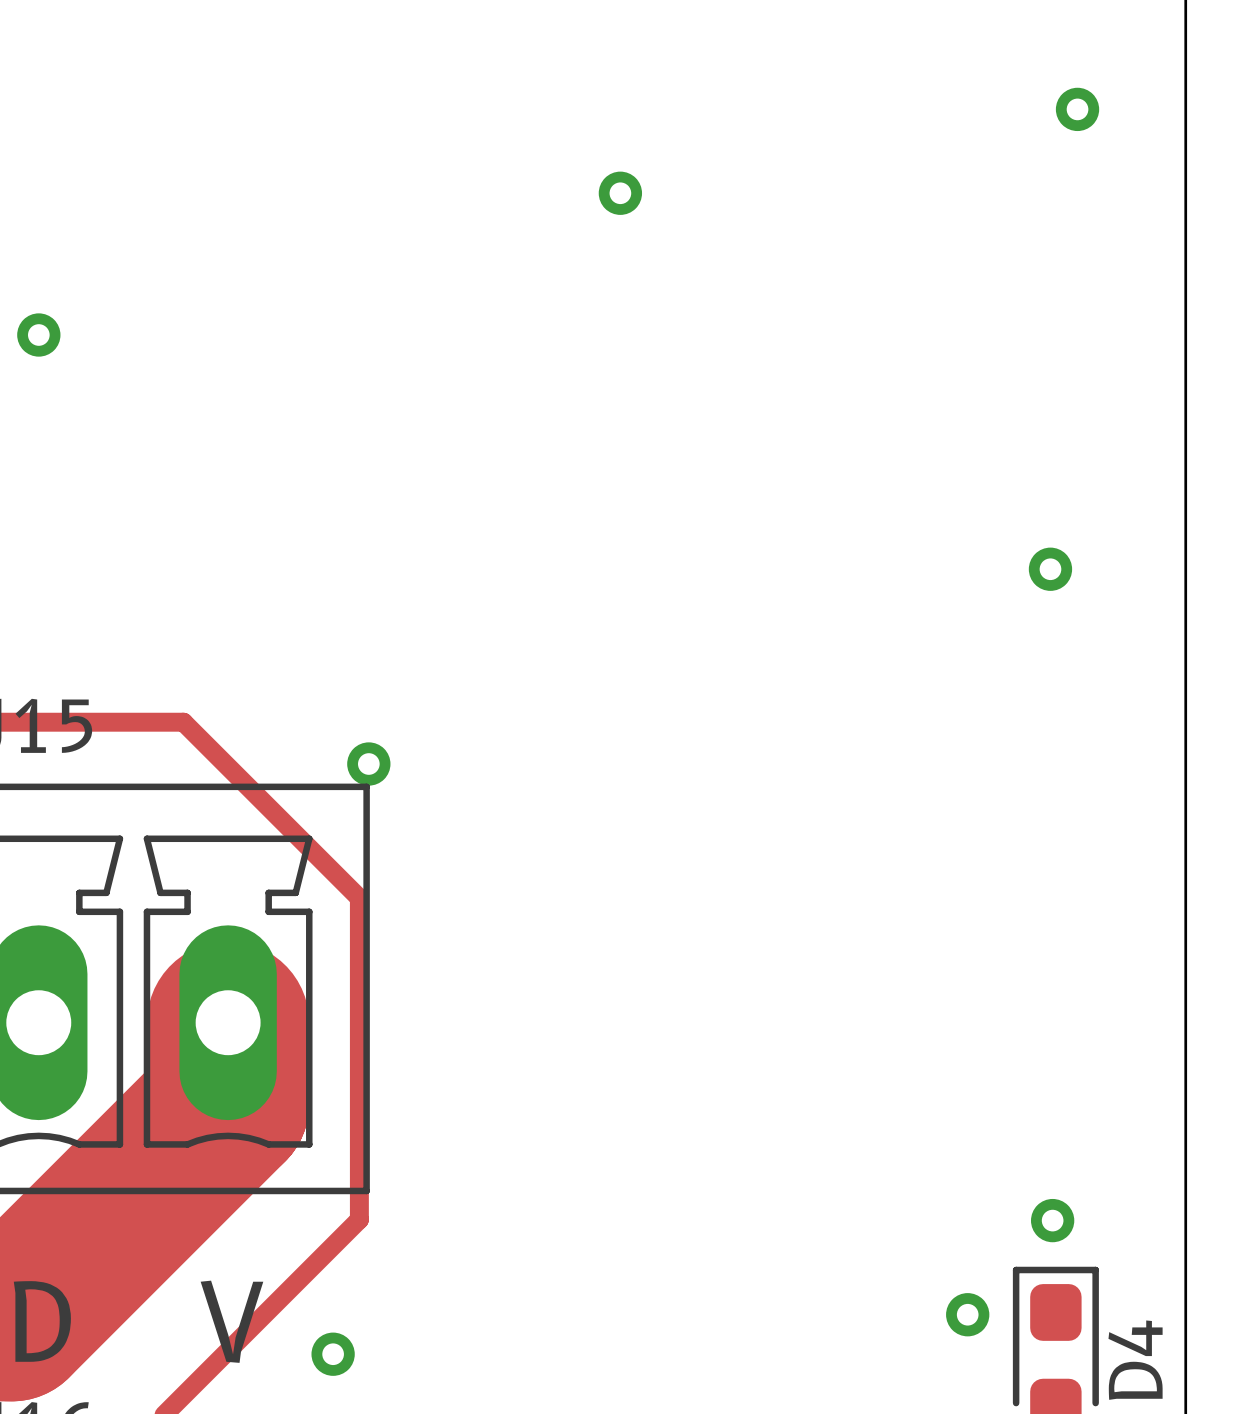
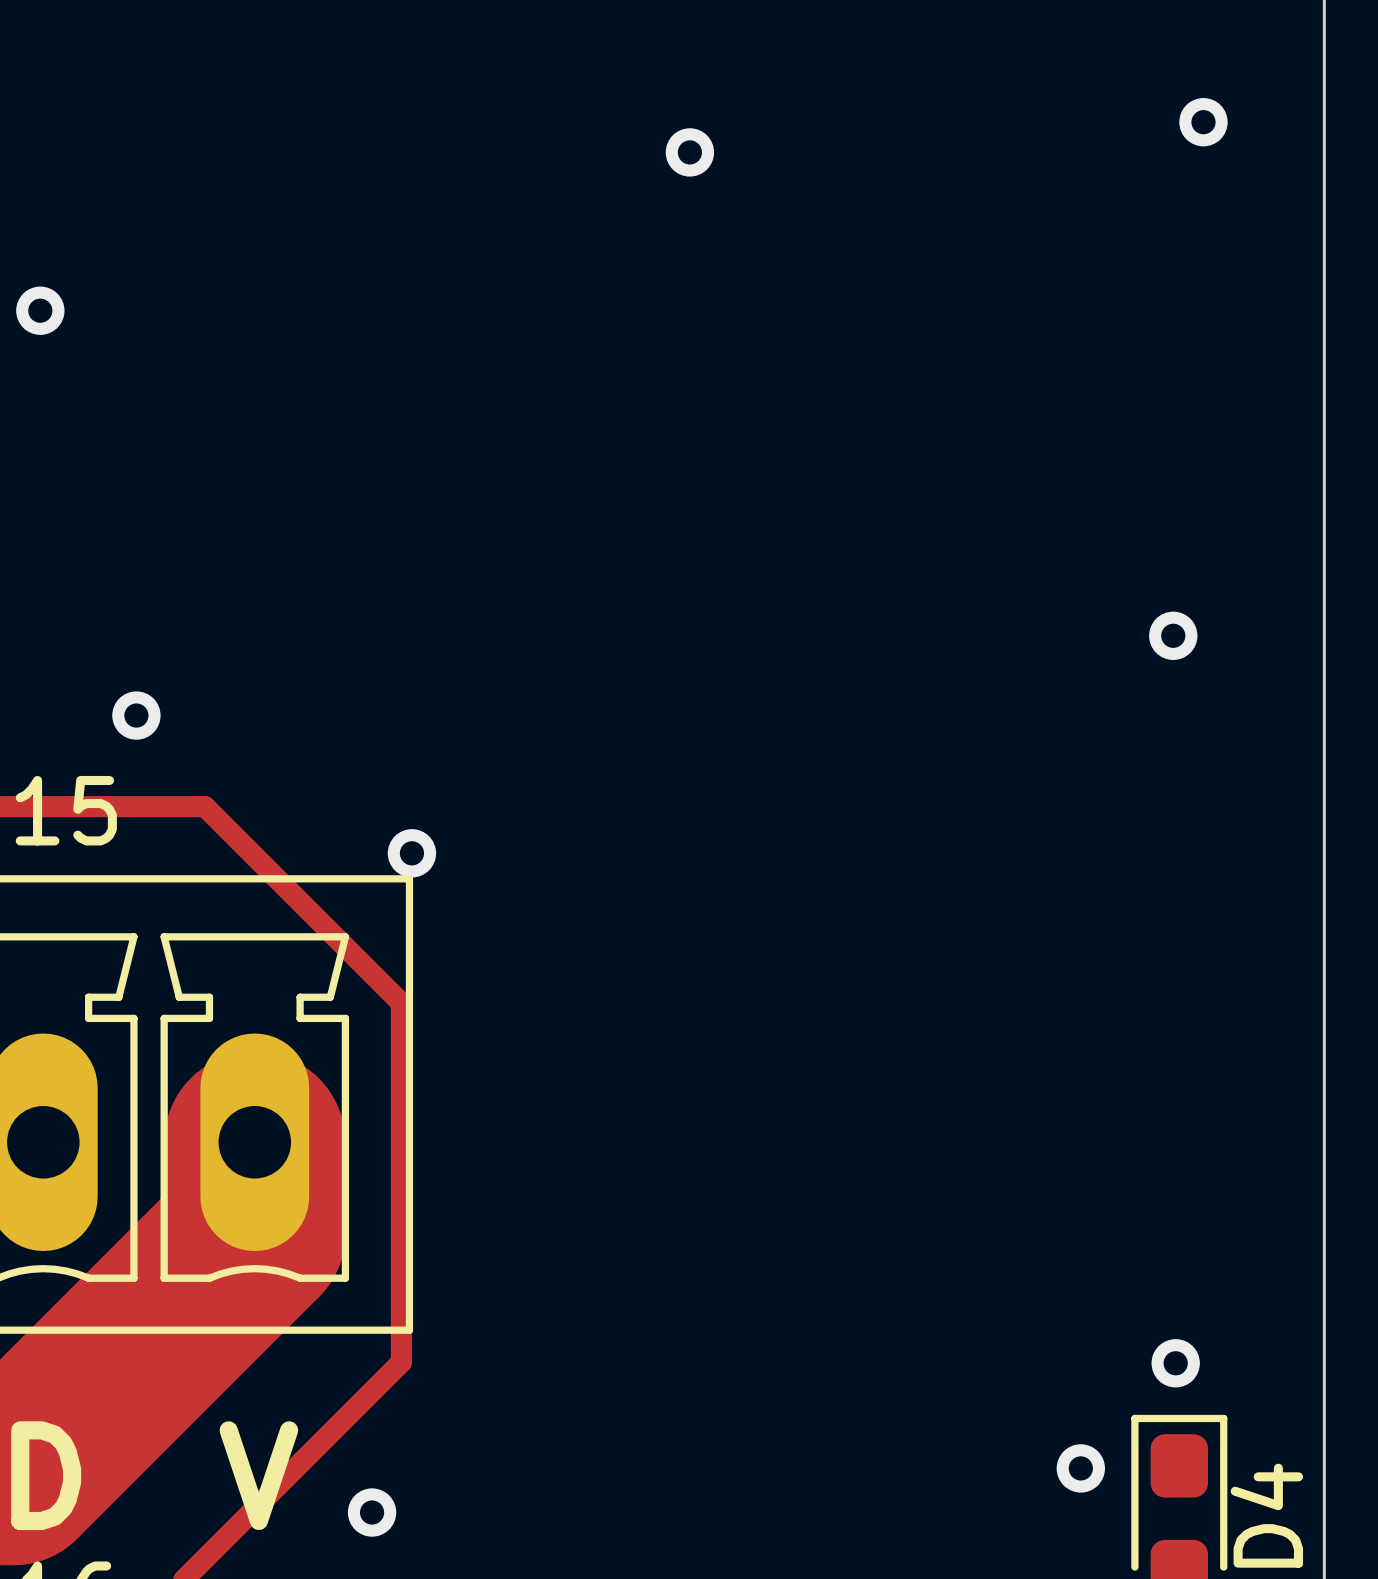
via position: (620, 193) -> (689, 152)
via: none -> (40, 310)
via: (38, 335) -> none
via: none -> (136, 715)

